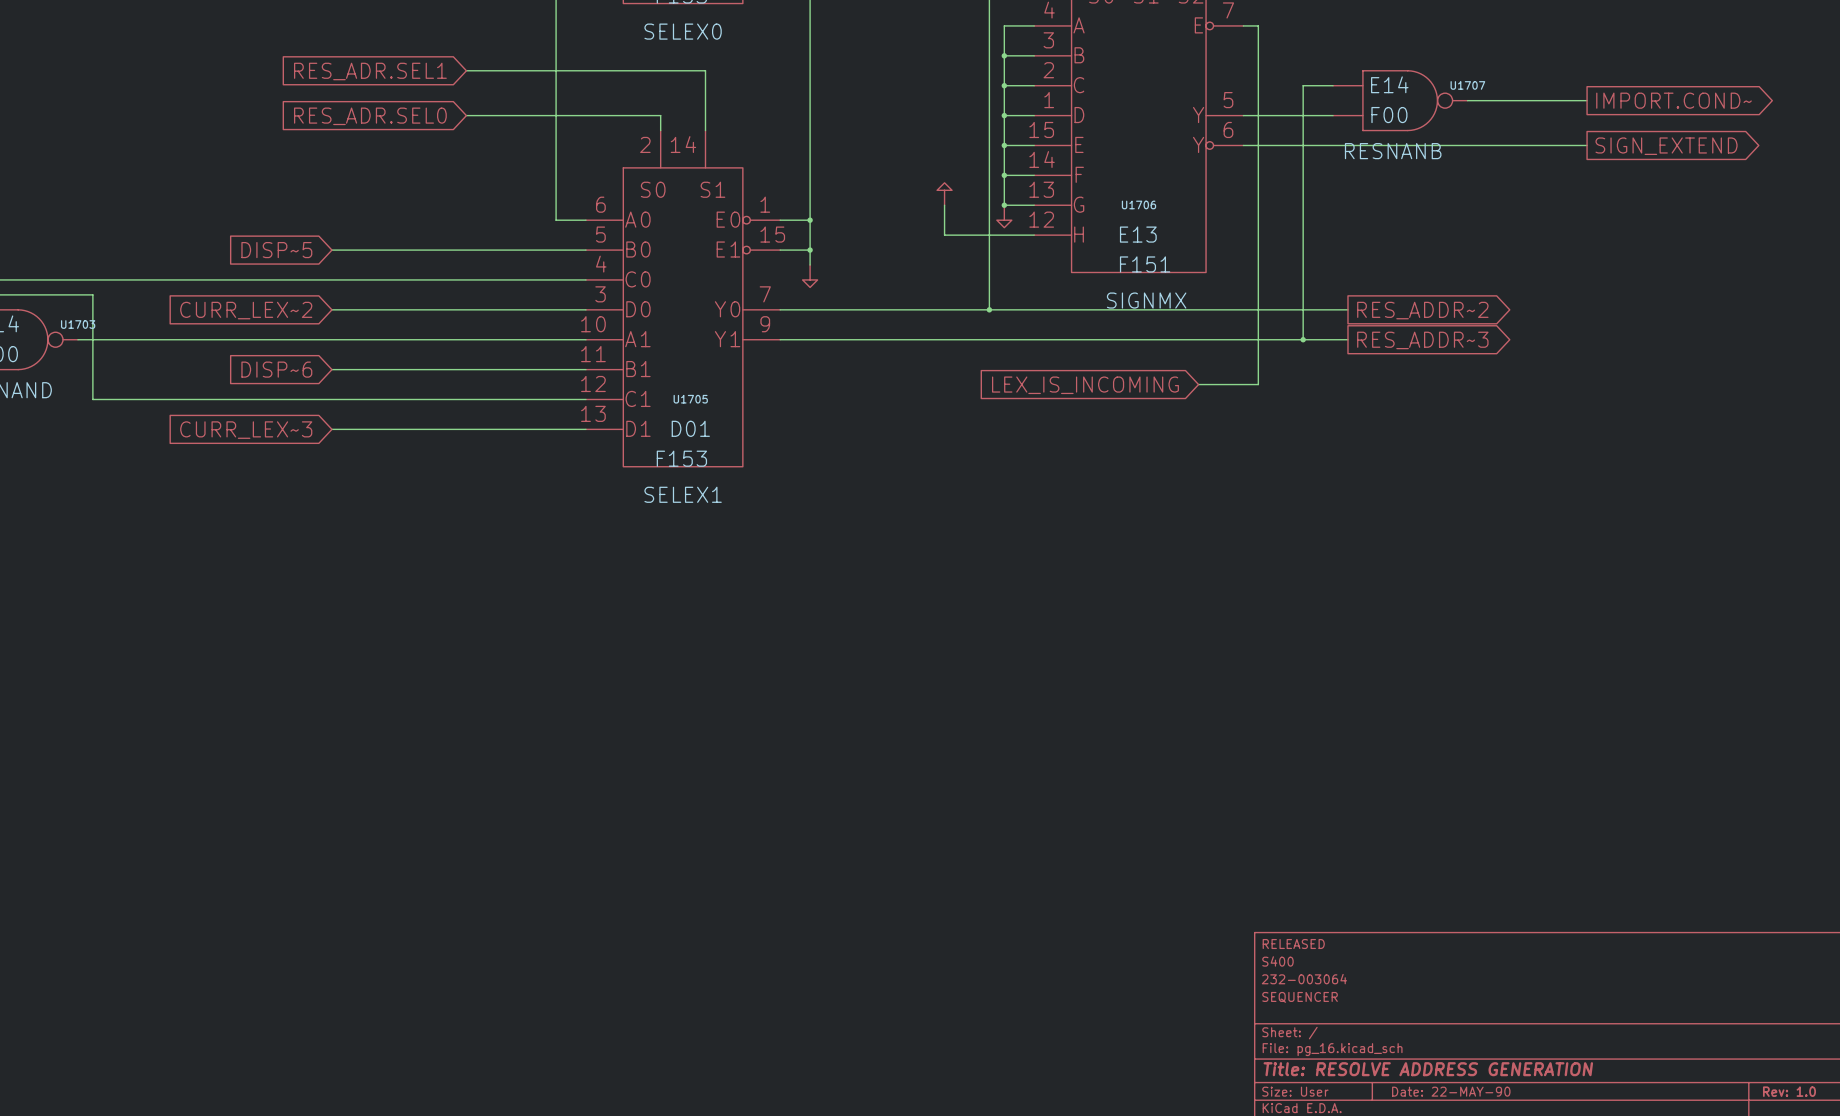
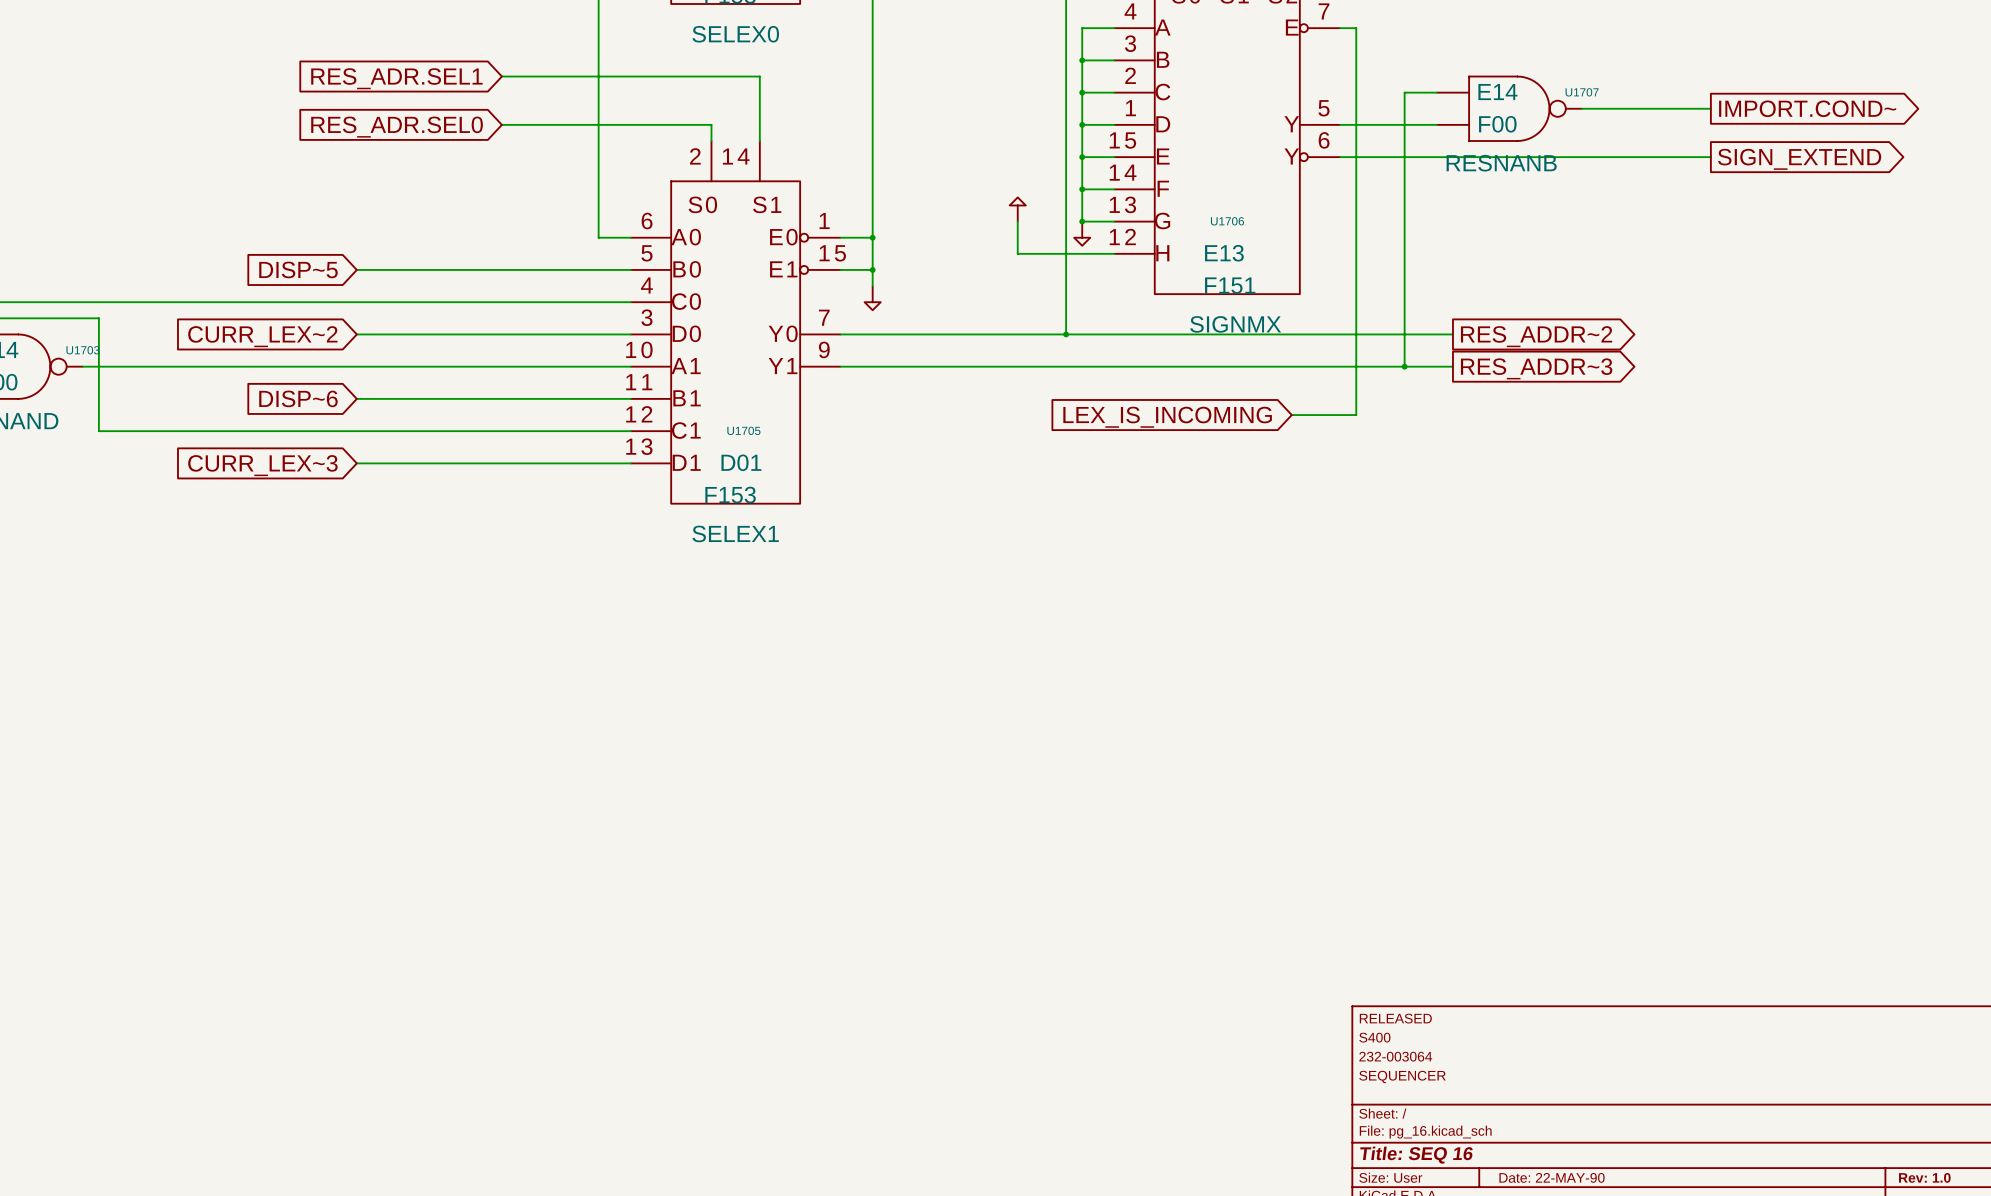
title block: Title: RESOLVE ADDRESS GENERATION (1428, 1069) -> Title: SEQ 16 (1416, 1155)

